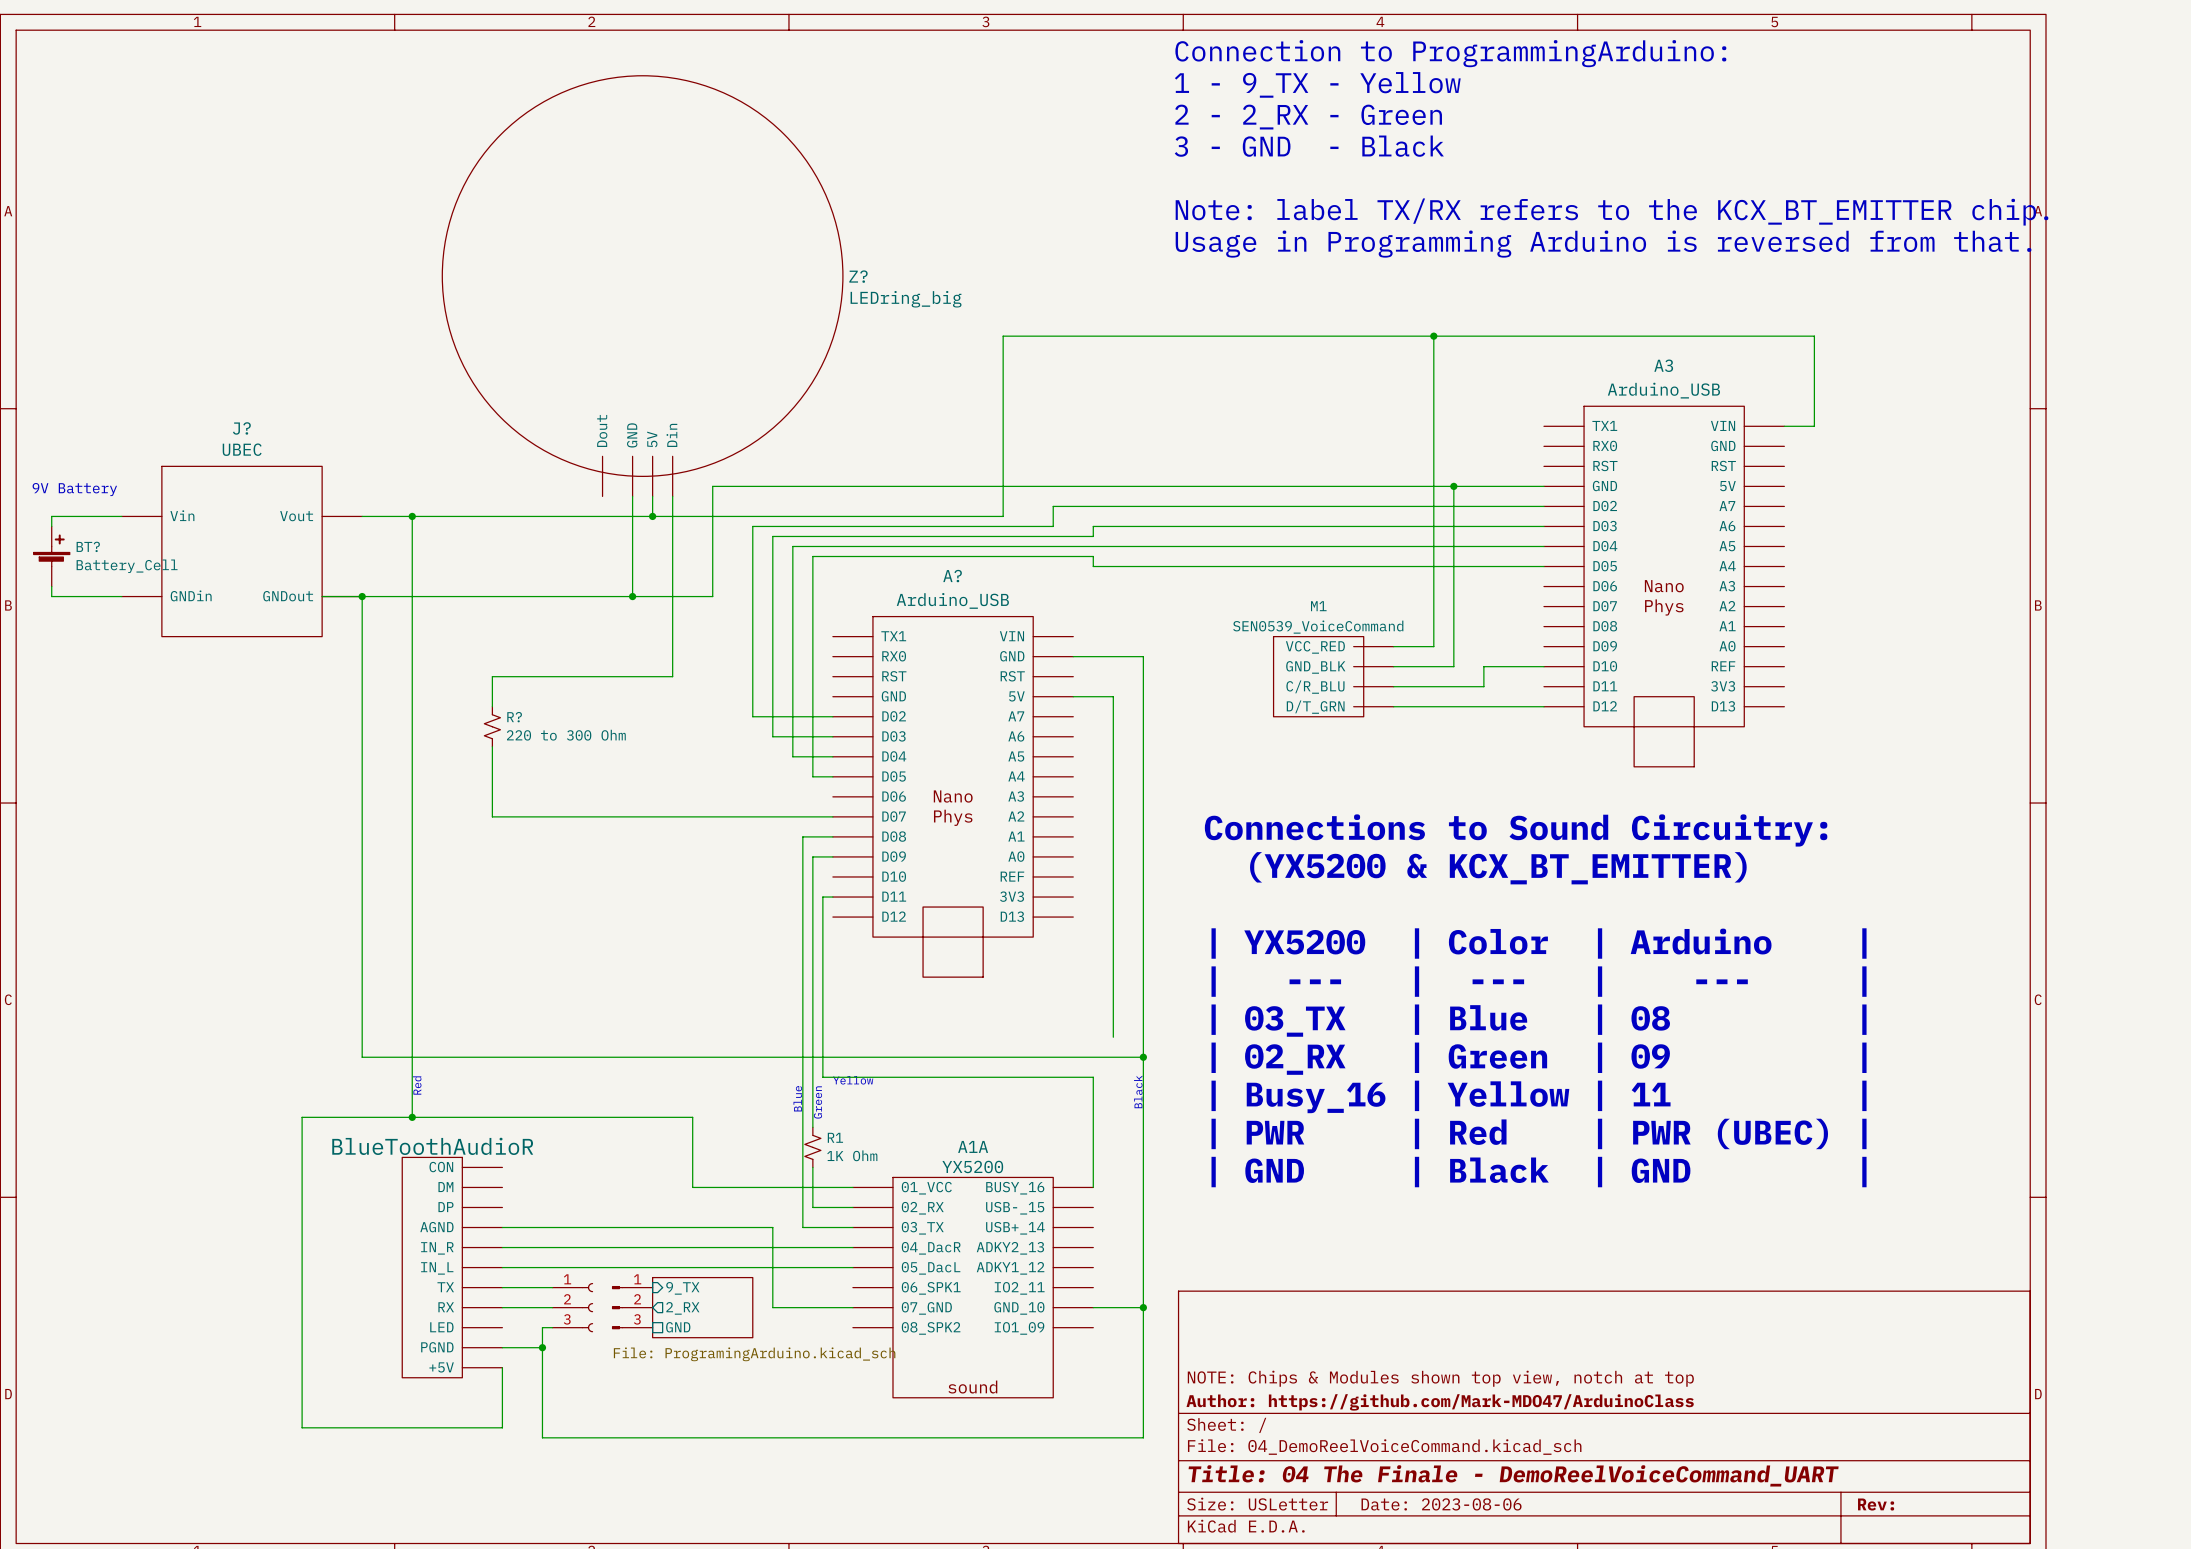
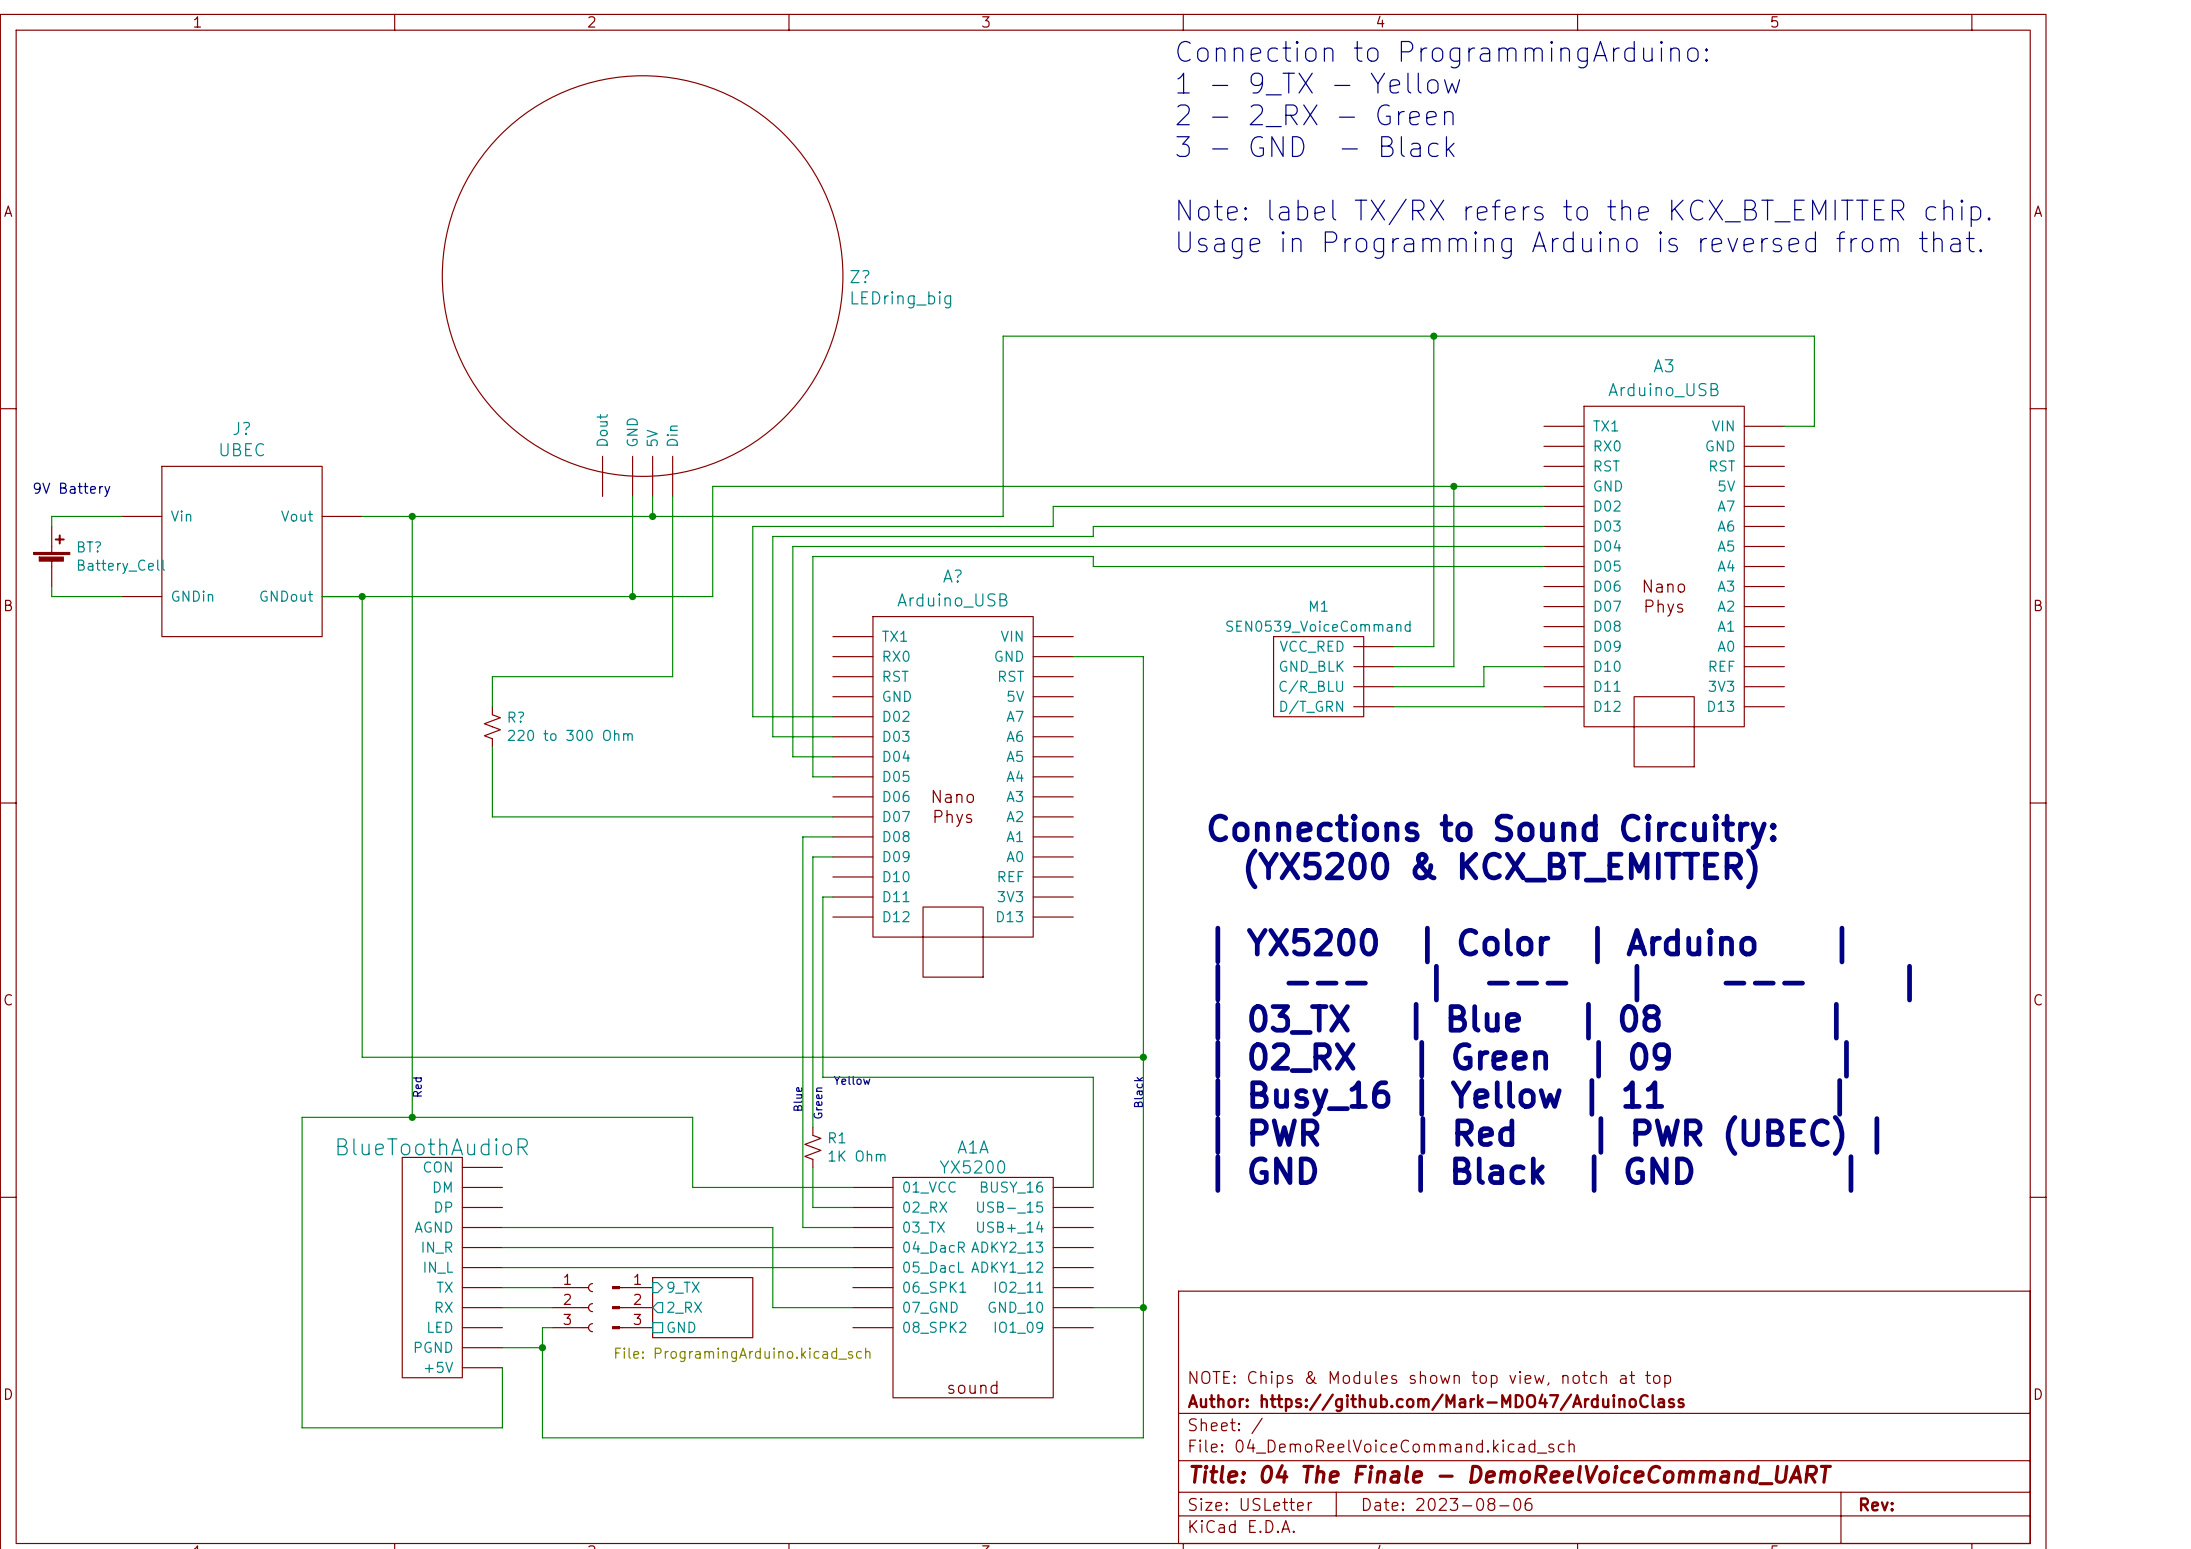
wire: (1073, 696) (1113, 696) (1113, 1037) -> none

